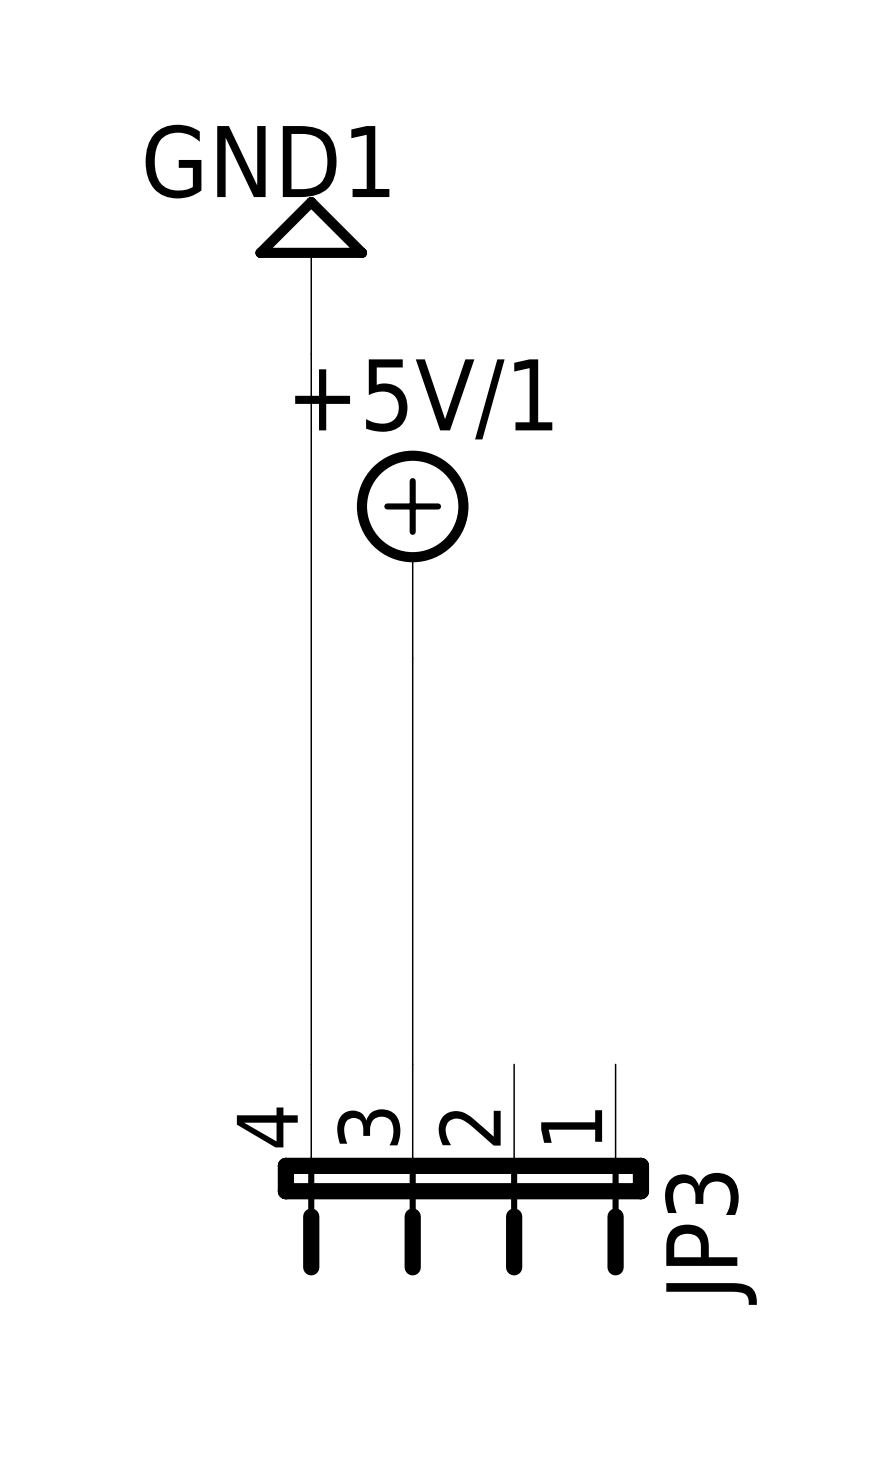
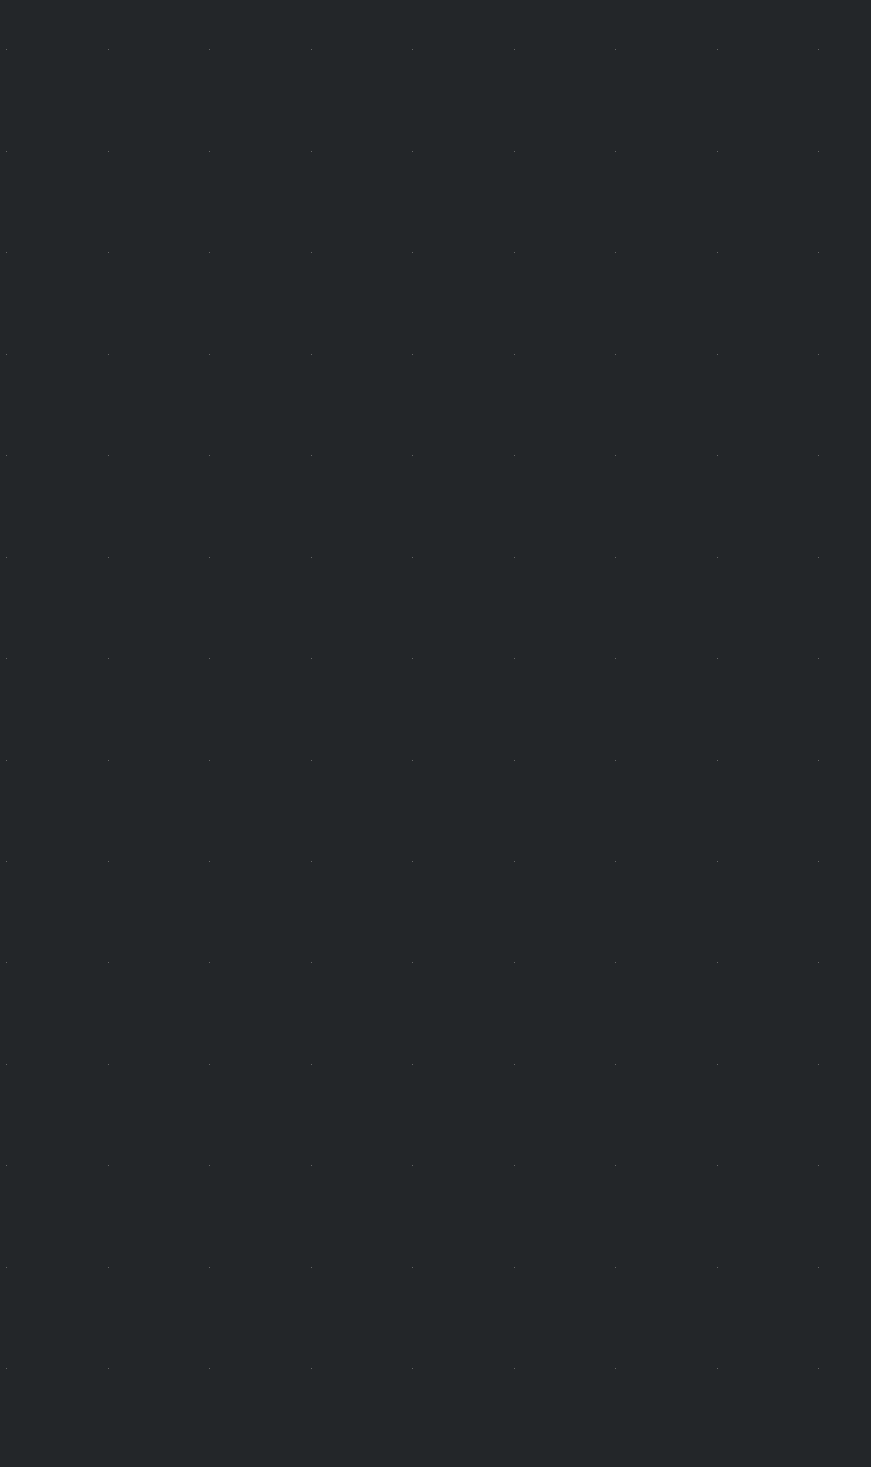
power symbol: GND1 (311, 275) -> none
wire: (311, 354) (311, 1064) -> none
power symbol: +5V/1 (412, 554) -> none
wire: (412, 658) (412, 1064) -> none
JP3: (463, 1169) -> none

